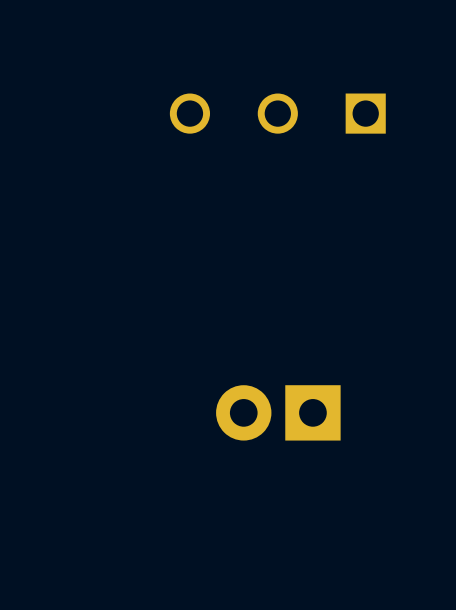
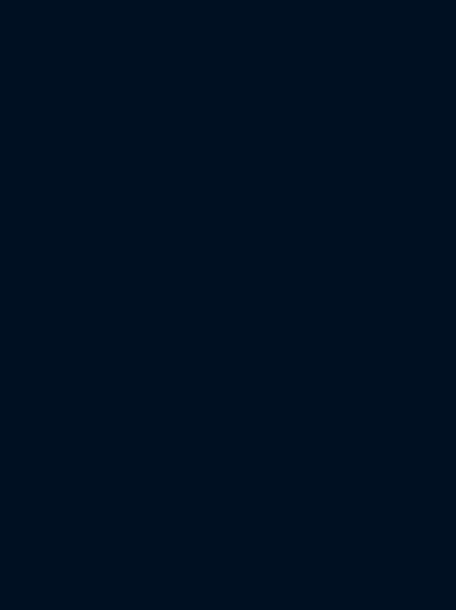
part: (277, 113) -> none
part: (278, 412) -> none

